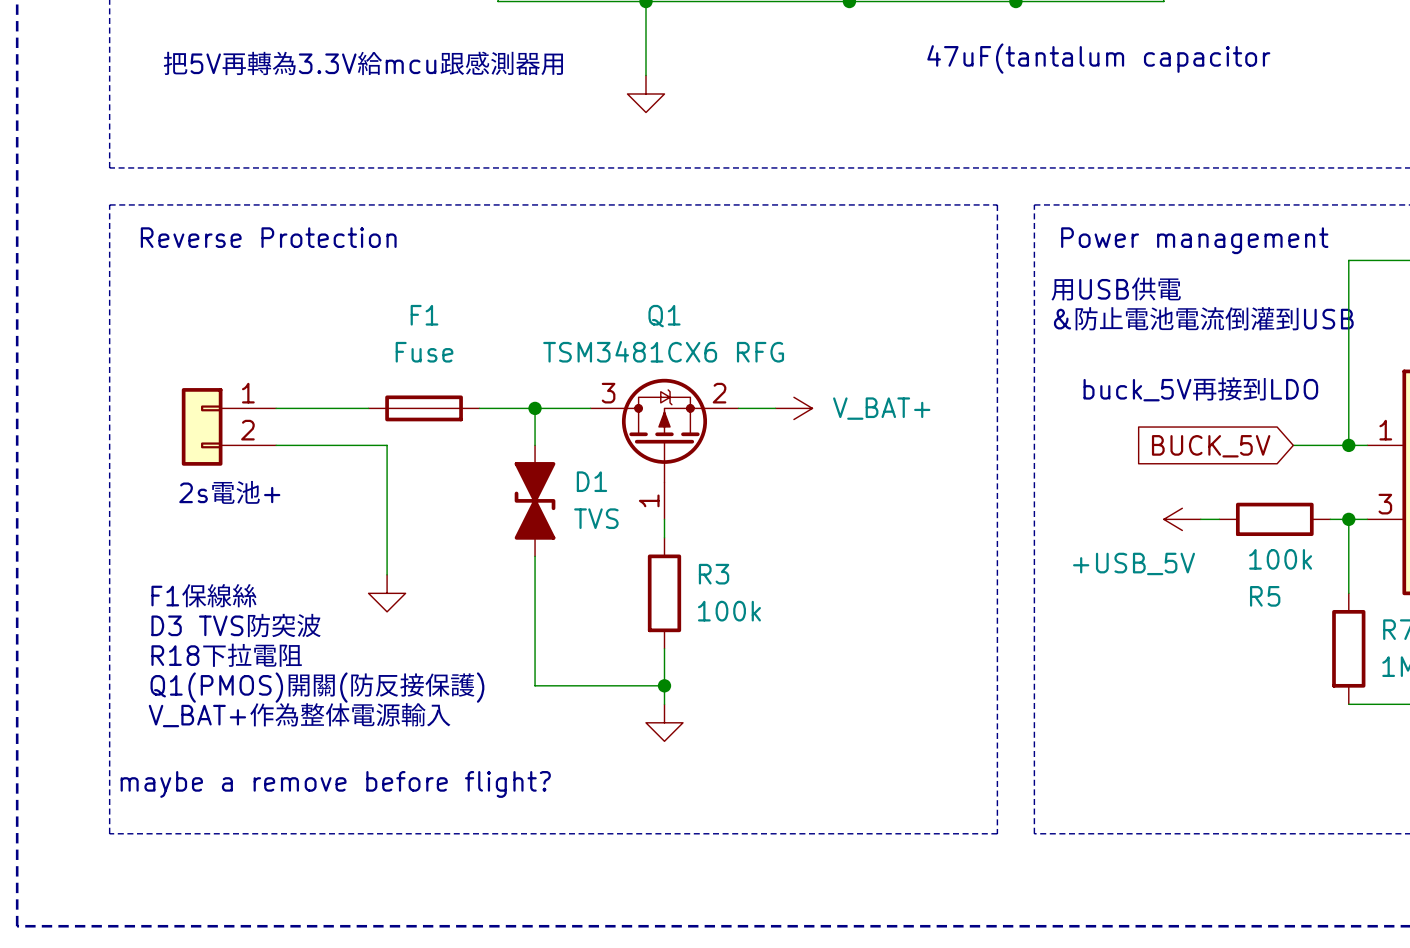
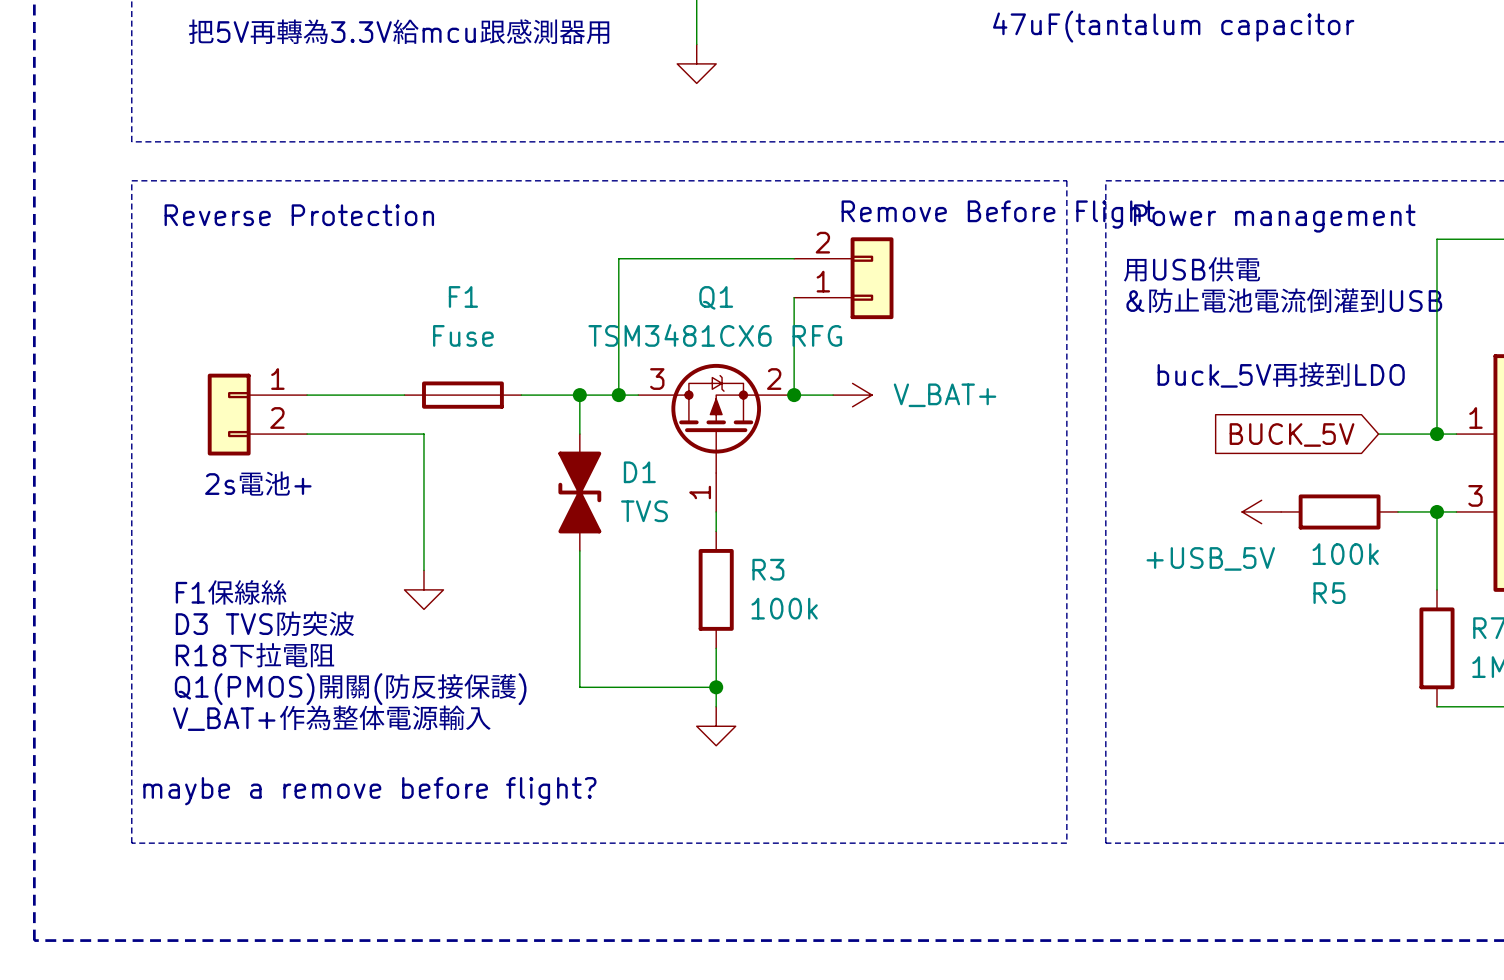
text: none -> Remove Before Flight (998, 214)
wire: none -> (794, 258) (618, 258) (618, 395)
part: none -> (843, 278)
wire: none -> (794, 297) (794, 395)
junction: none -> (618, 395)
junction: none -> (794, 395)
R5 position: (1274, 519) -> (1339, 511)

